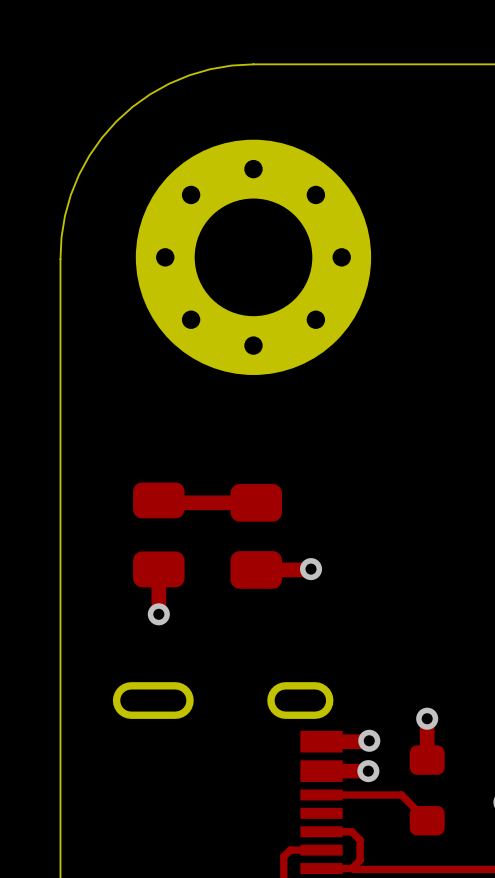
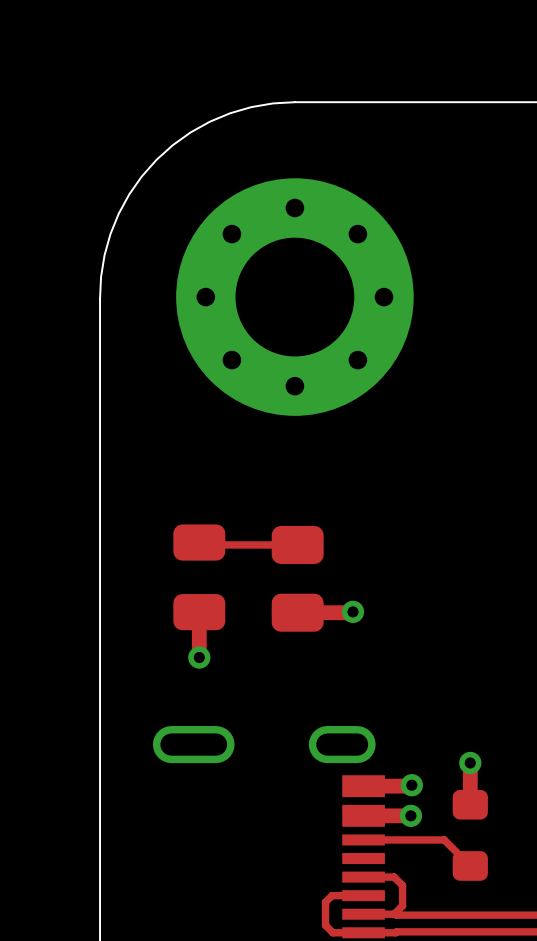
top track width: thick (256, 502) (161, 502) -> thin (297, 544) (201, 544)

